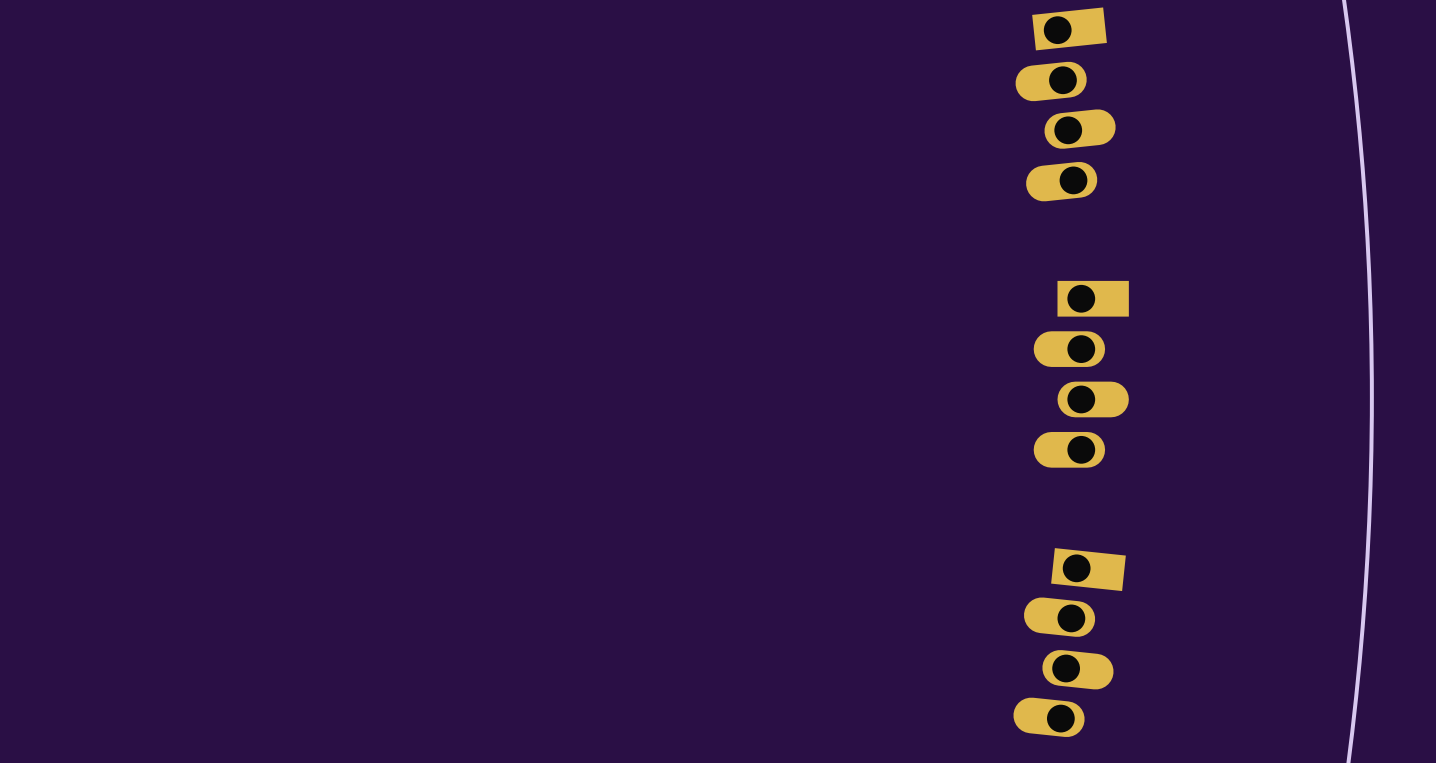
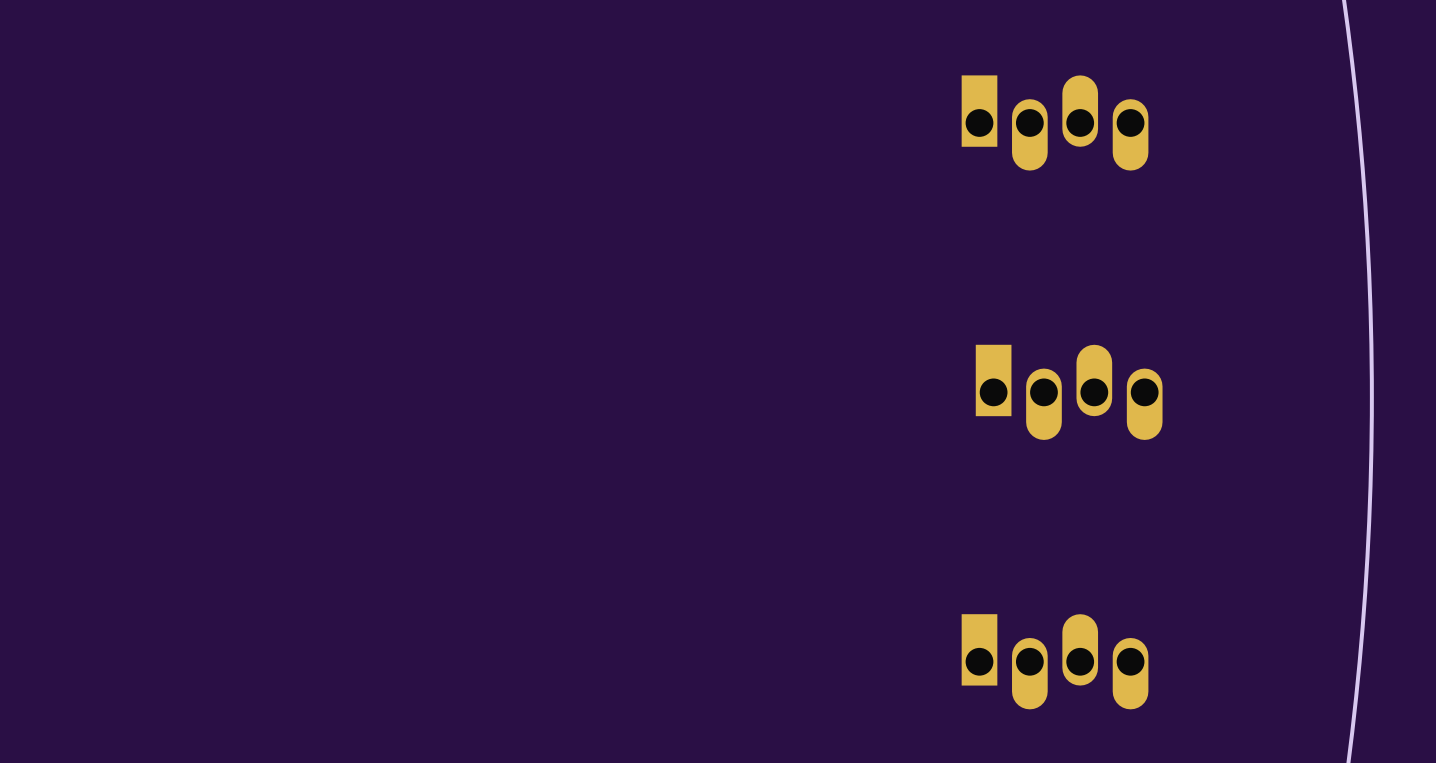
part rotation: 0° (1065, 104) -> 84° counterclockwise (1055, 122)
part rotation: 0° (1081, 374) -> 90° counterclockwise (1069, 392)
part rotation: 0° (1069, 642) -> 96° counterclockwise (1055, 661)

